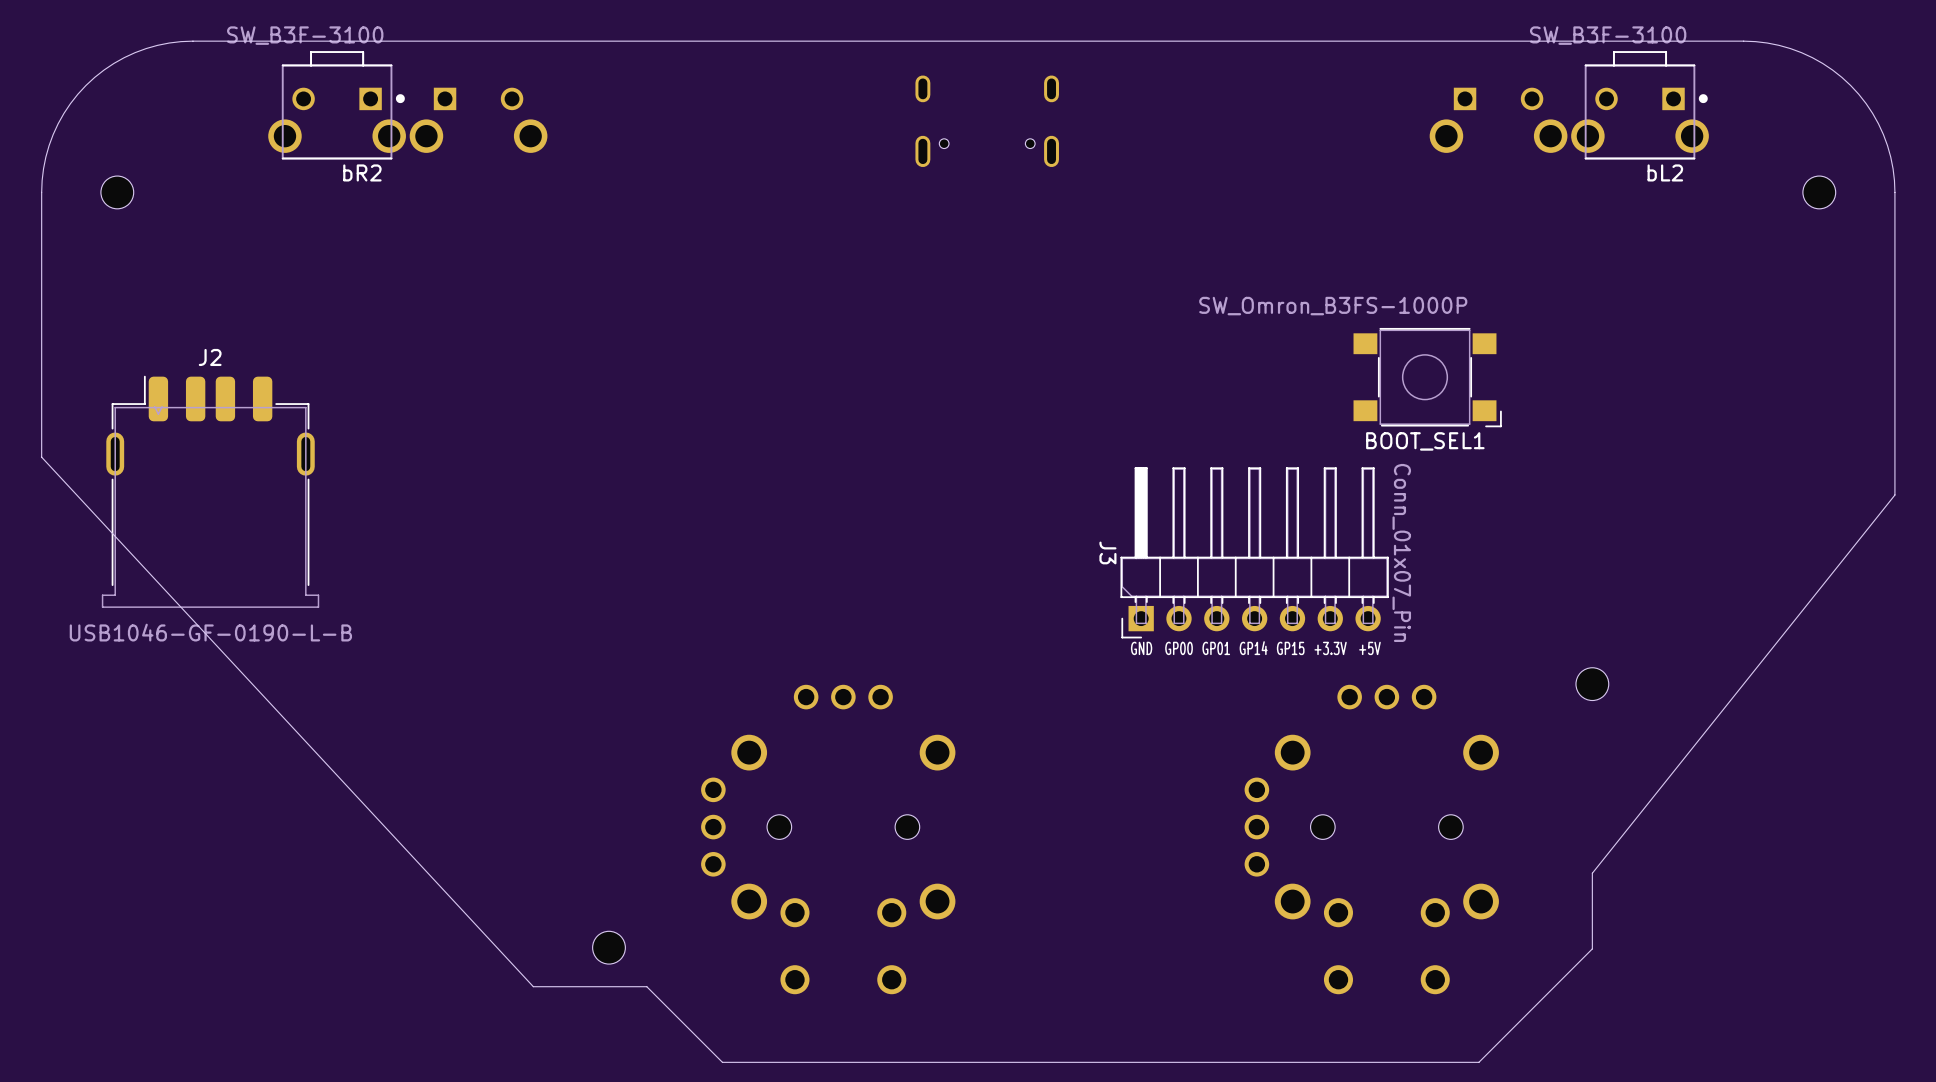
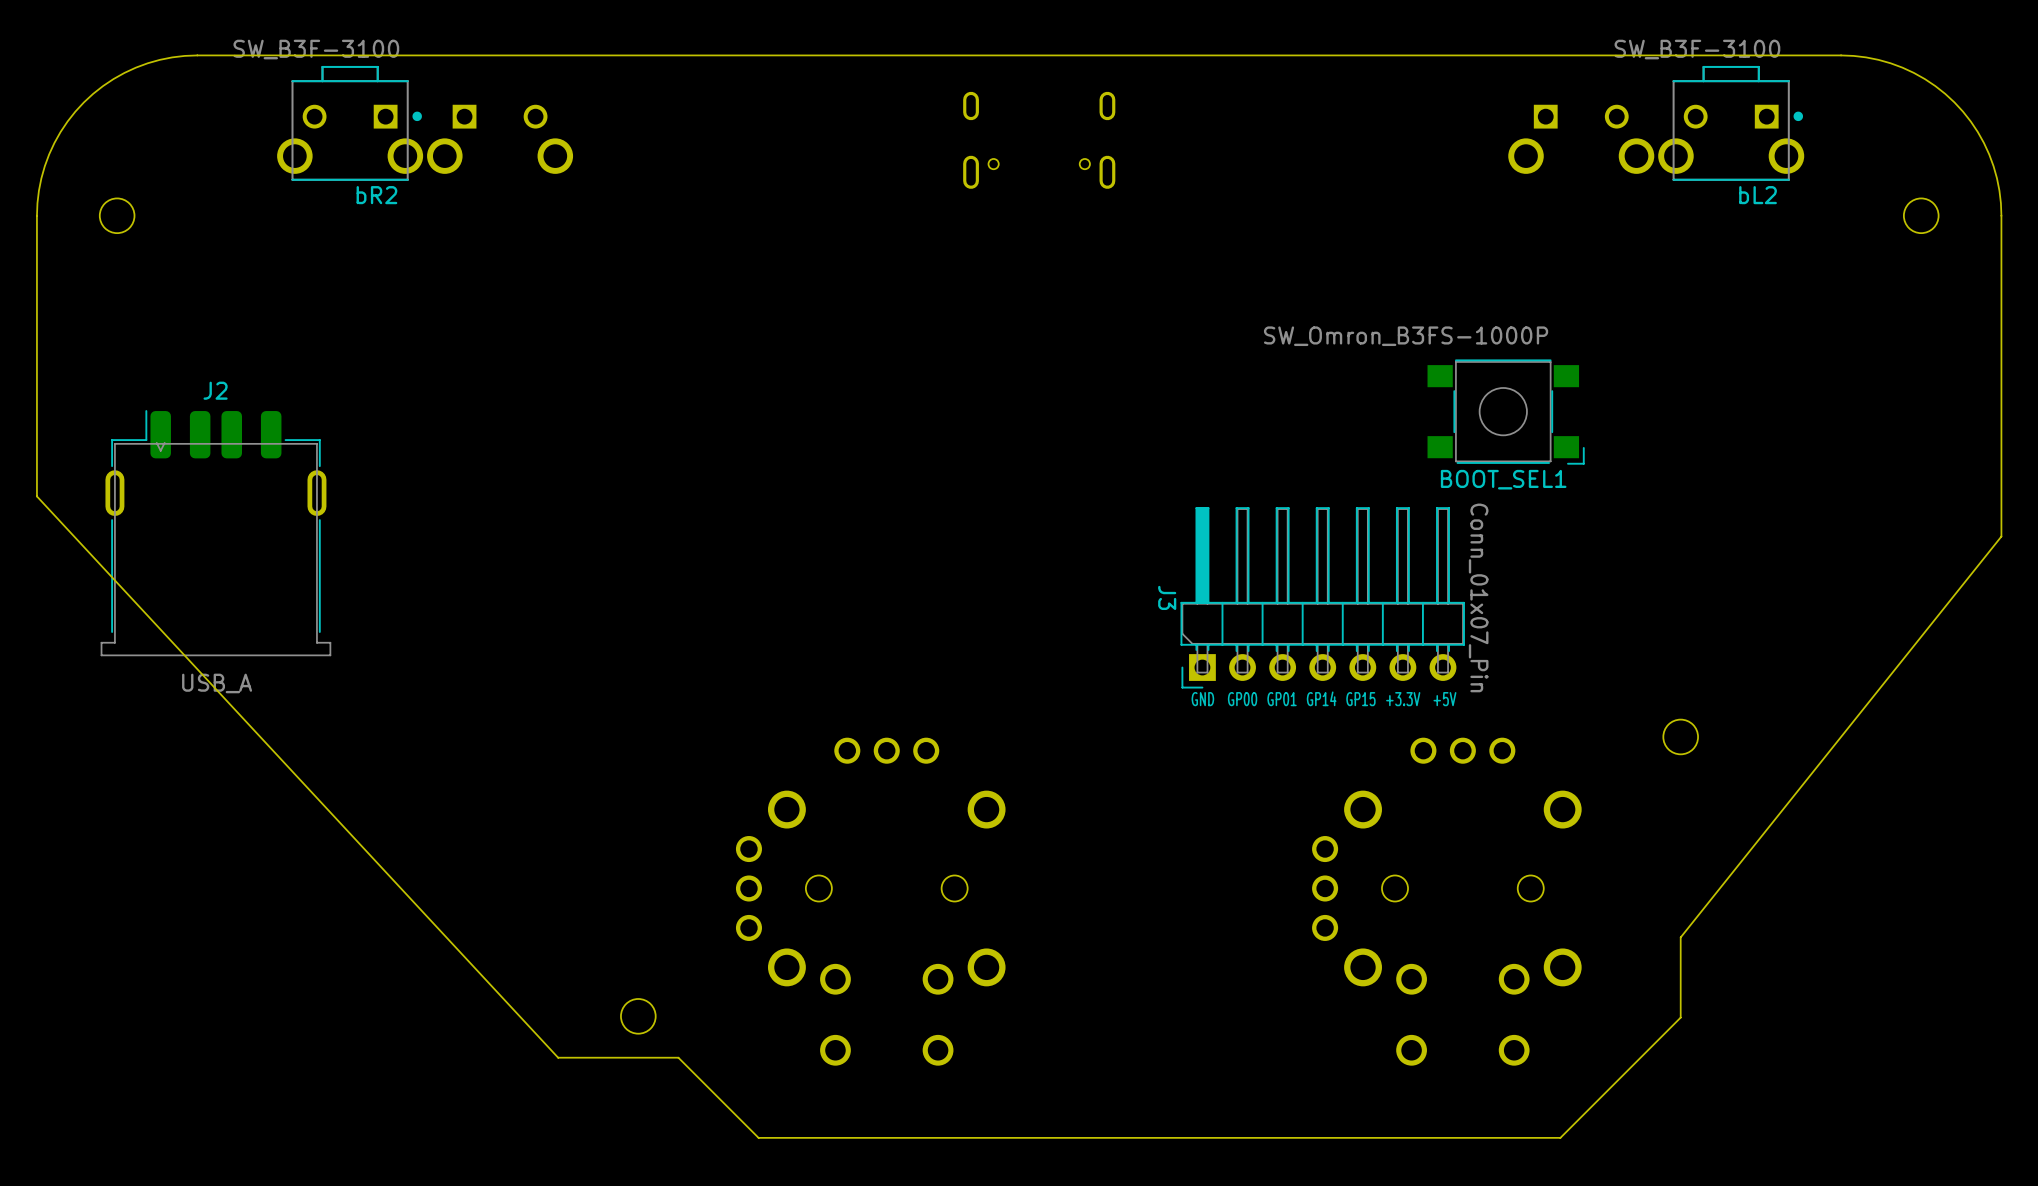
J2 value: USB1046-GF-0190-L-B (210, 632) -> USB_A (217, 683)

